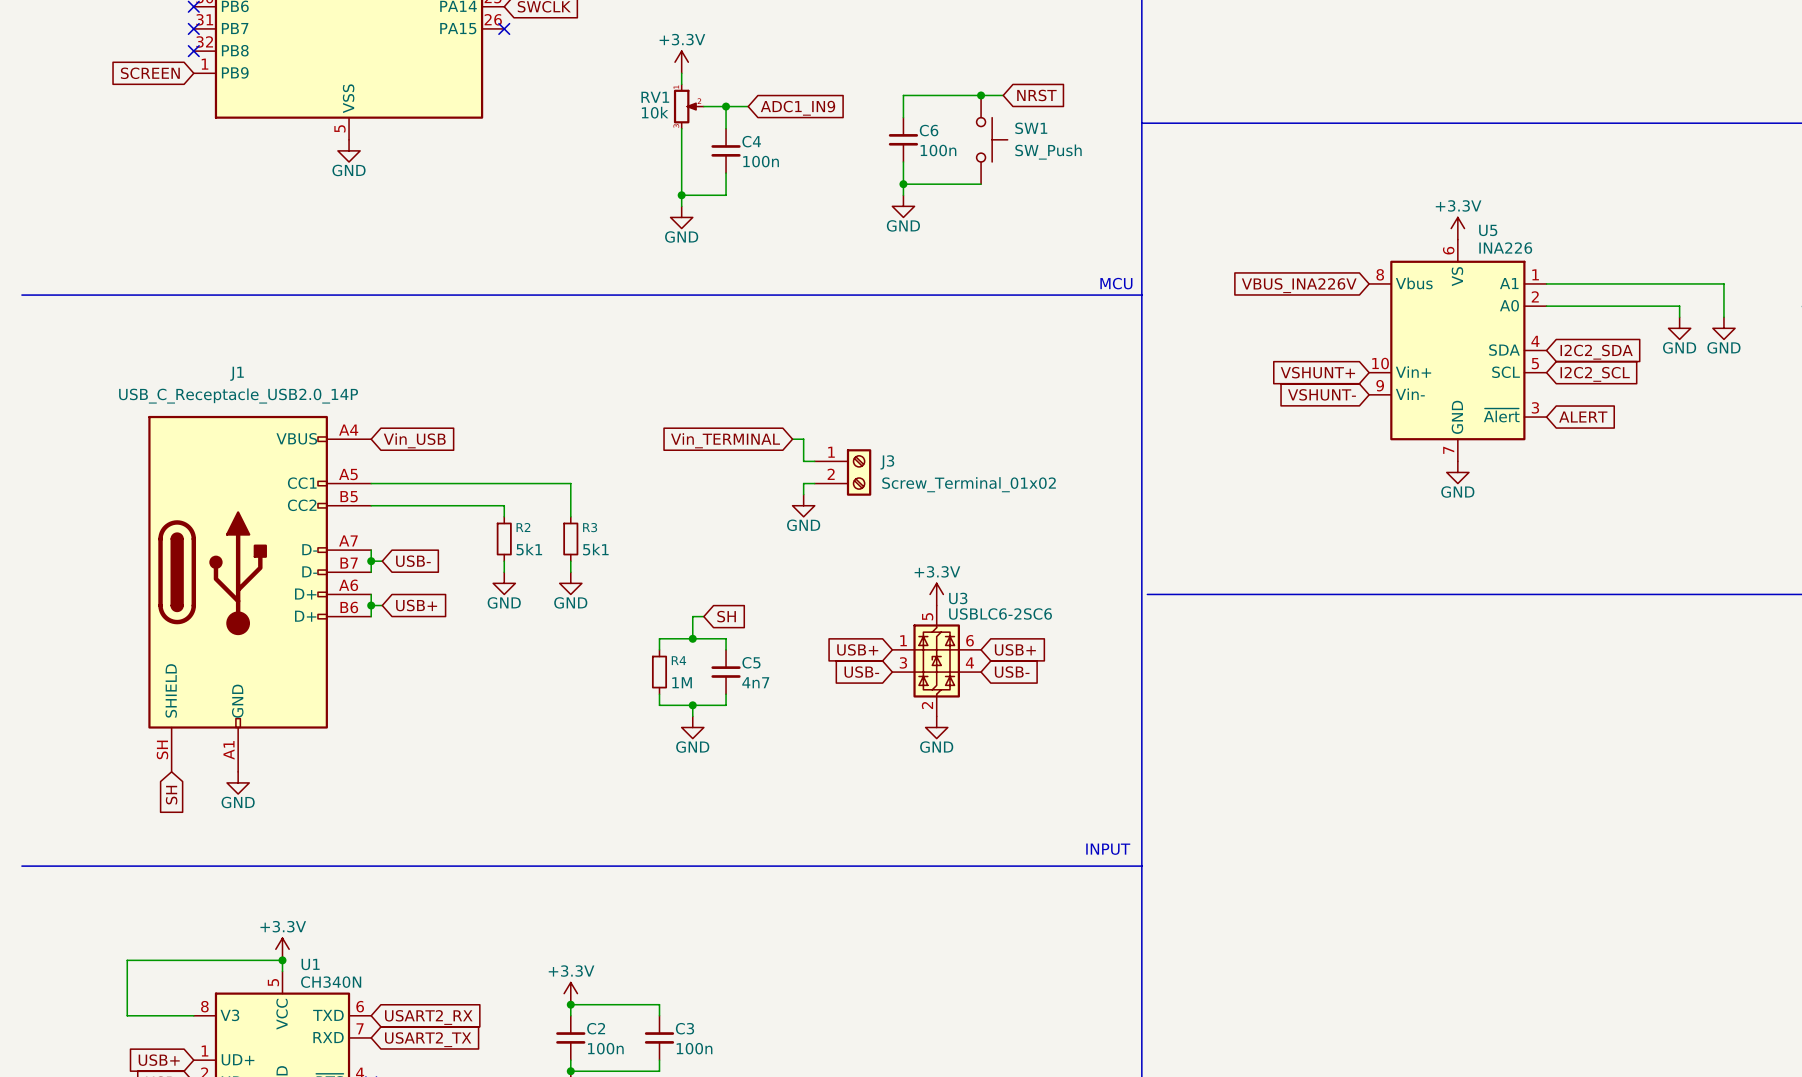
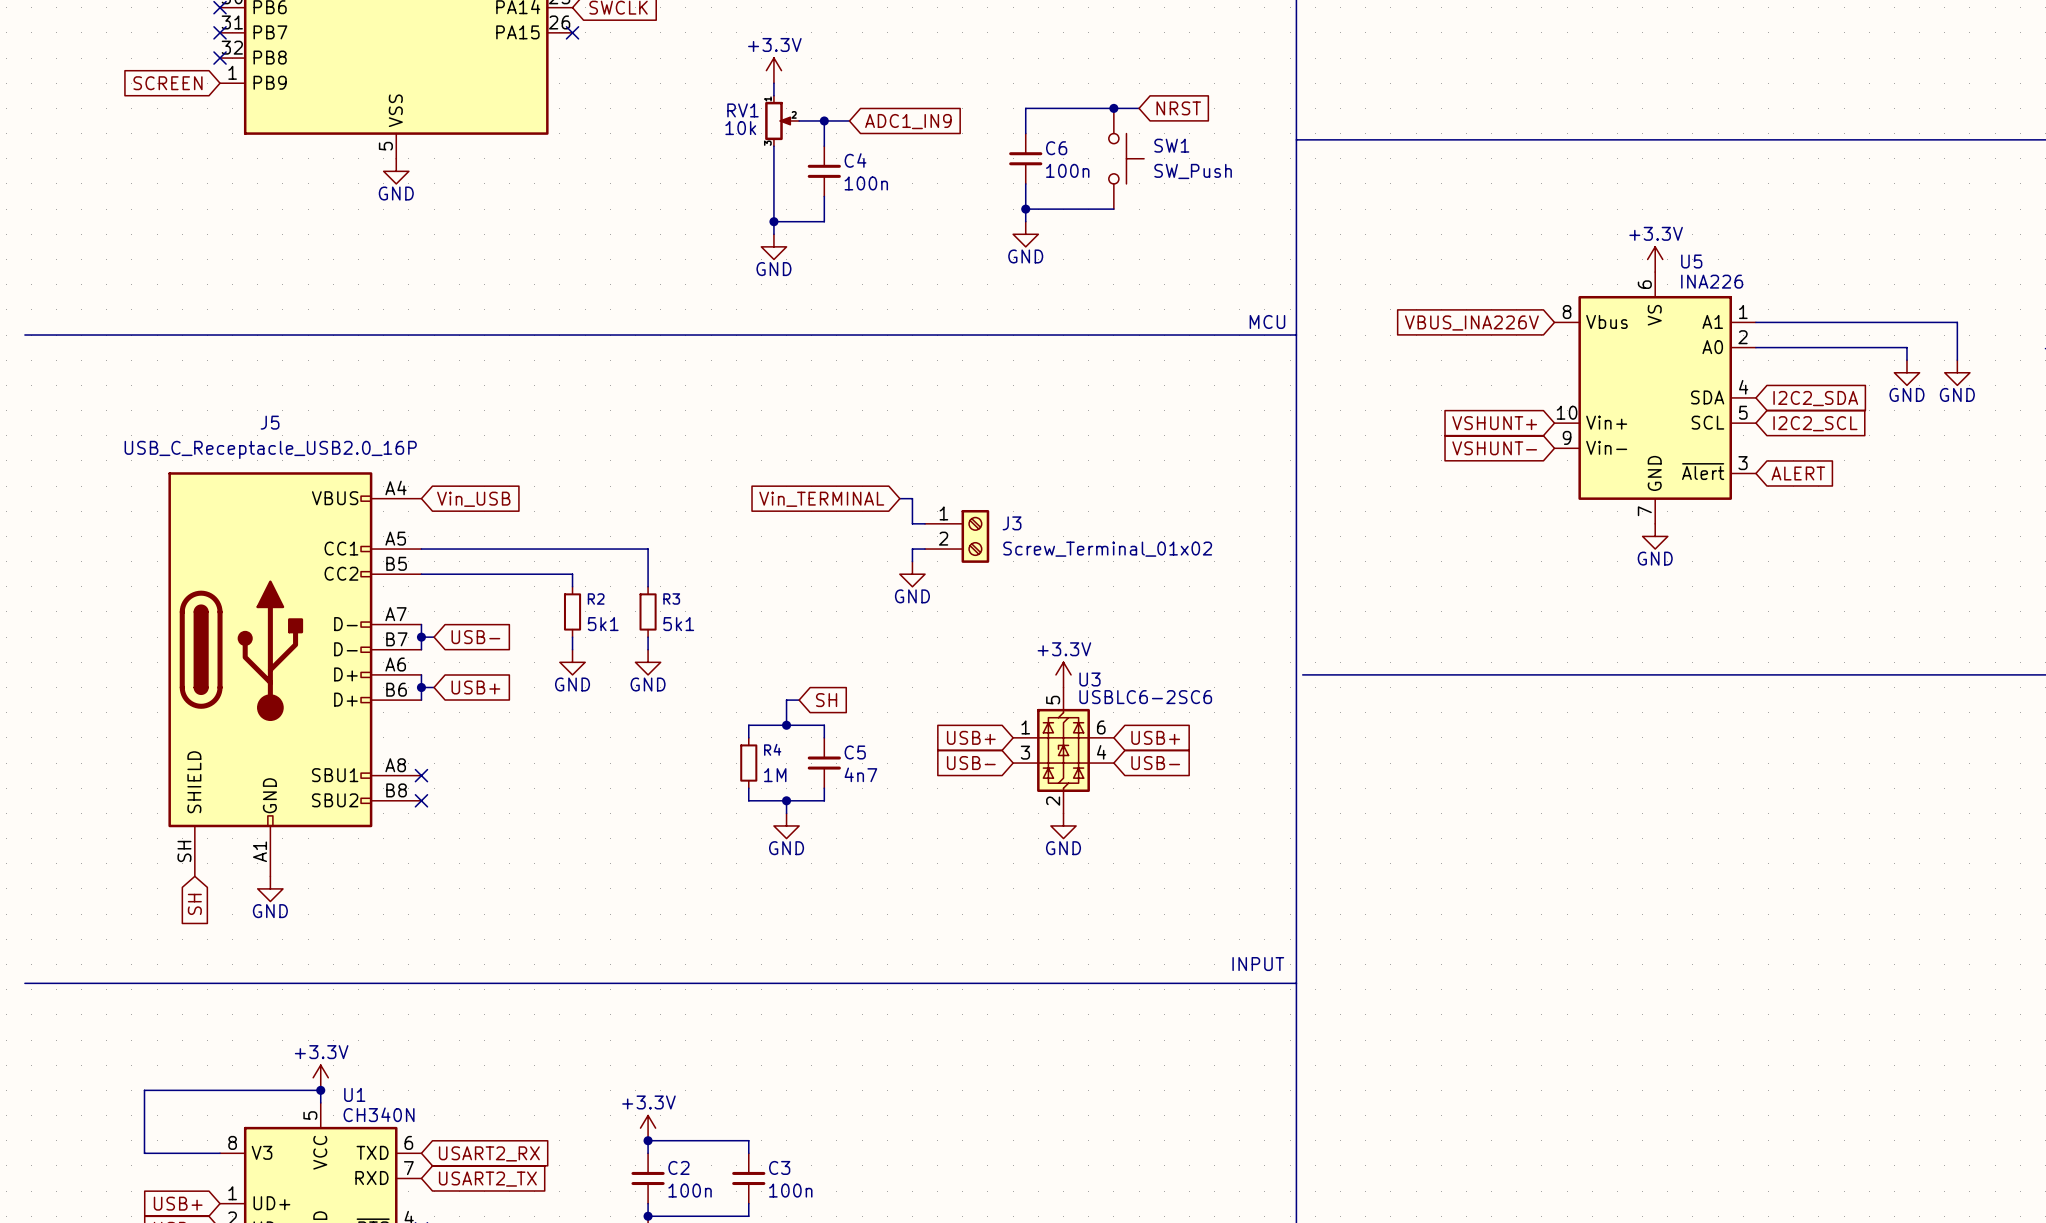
J1: USB_C_Receptacle_USB2.0_14P (259, 593) -> none
J5: none -> USB_C_Receptacle_USB2.0_16P (294, 674)
no-connect mark: none -> (421, 775)
no-connect mark: none -> (421, 800)

